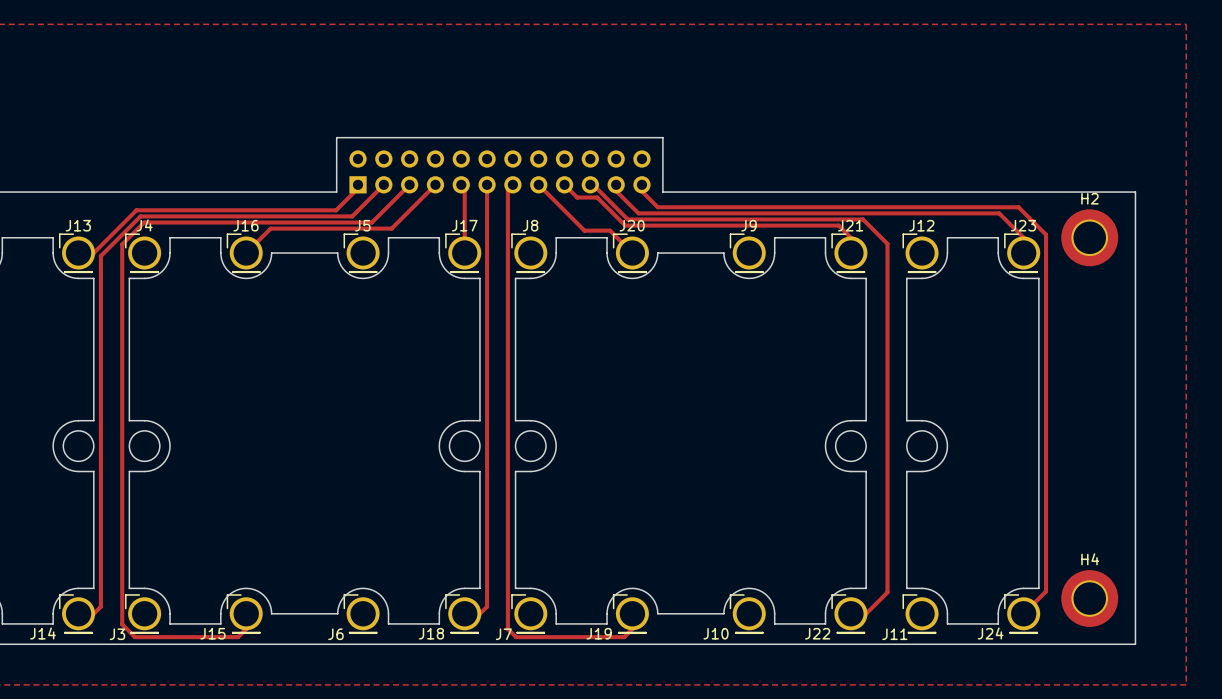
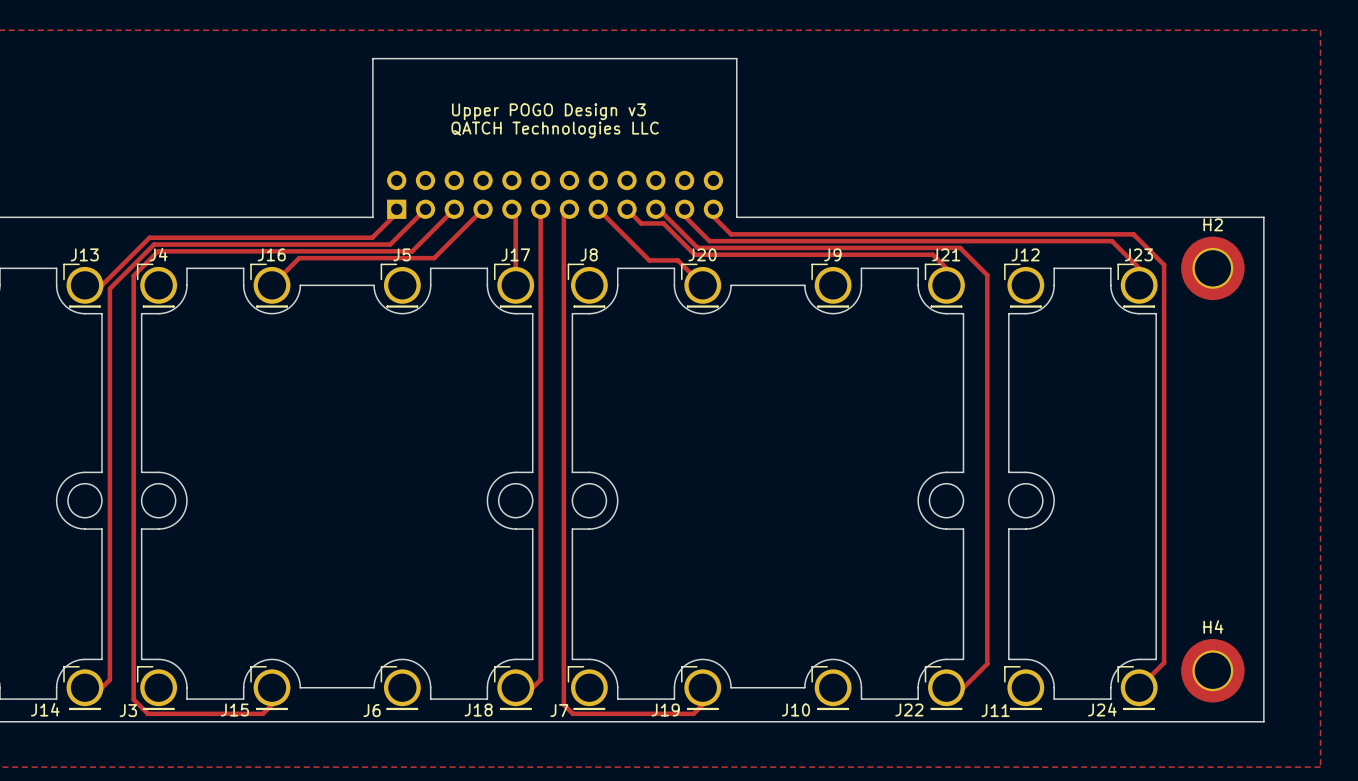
text: none -> Upper POGO Design v3 (548, 111)
text: none -> QATCH Technologies LLC (555, 129)
board edge: (336, 137) (662, 137) -> (372, 156) (372, 58) (736, 58) (736, 156)

